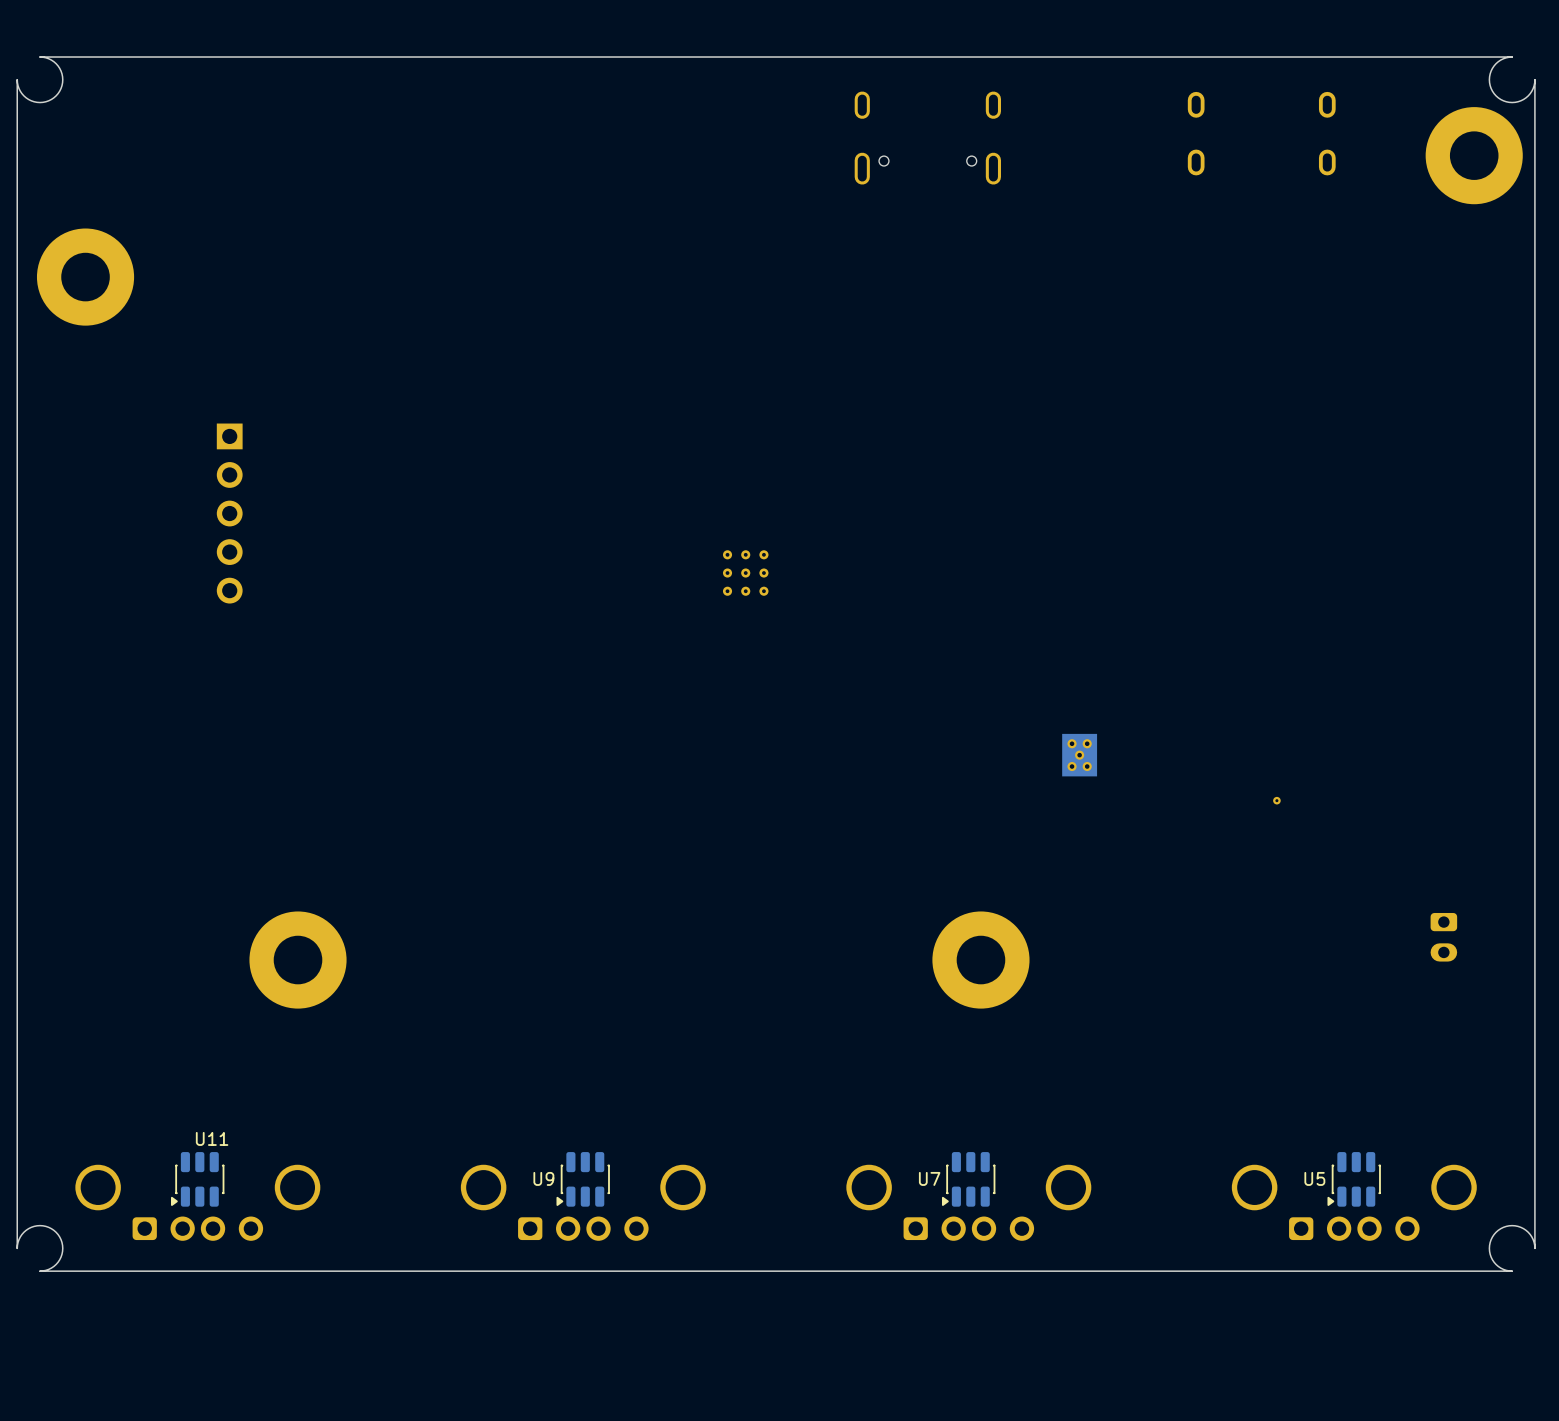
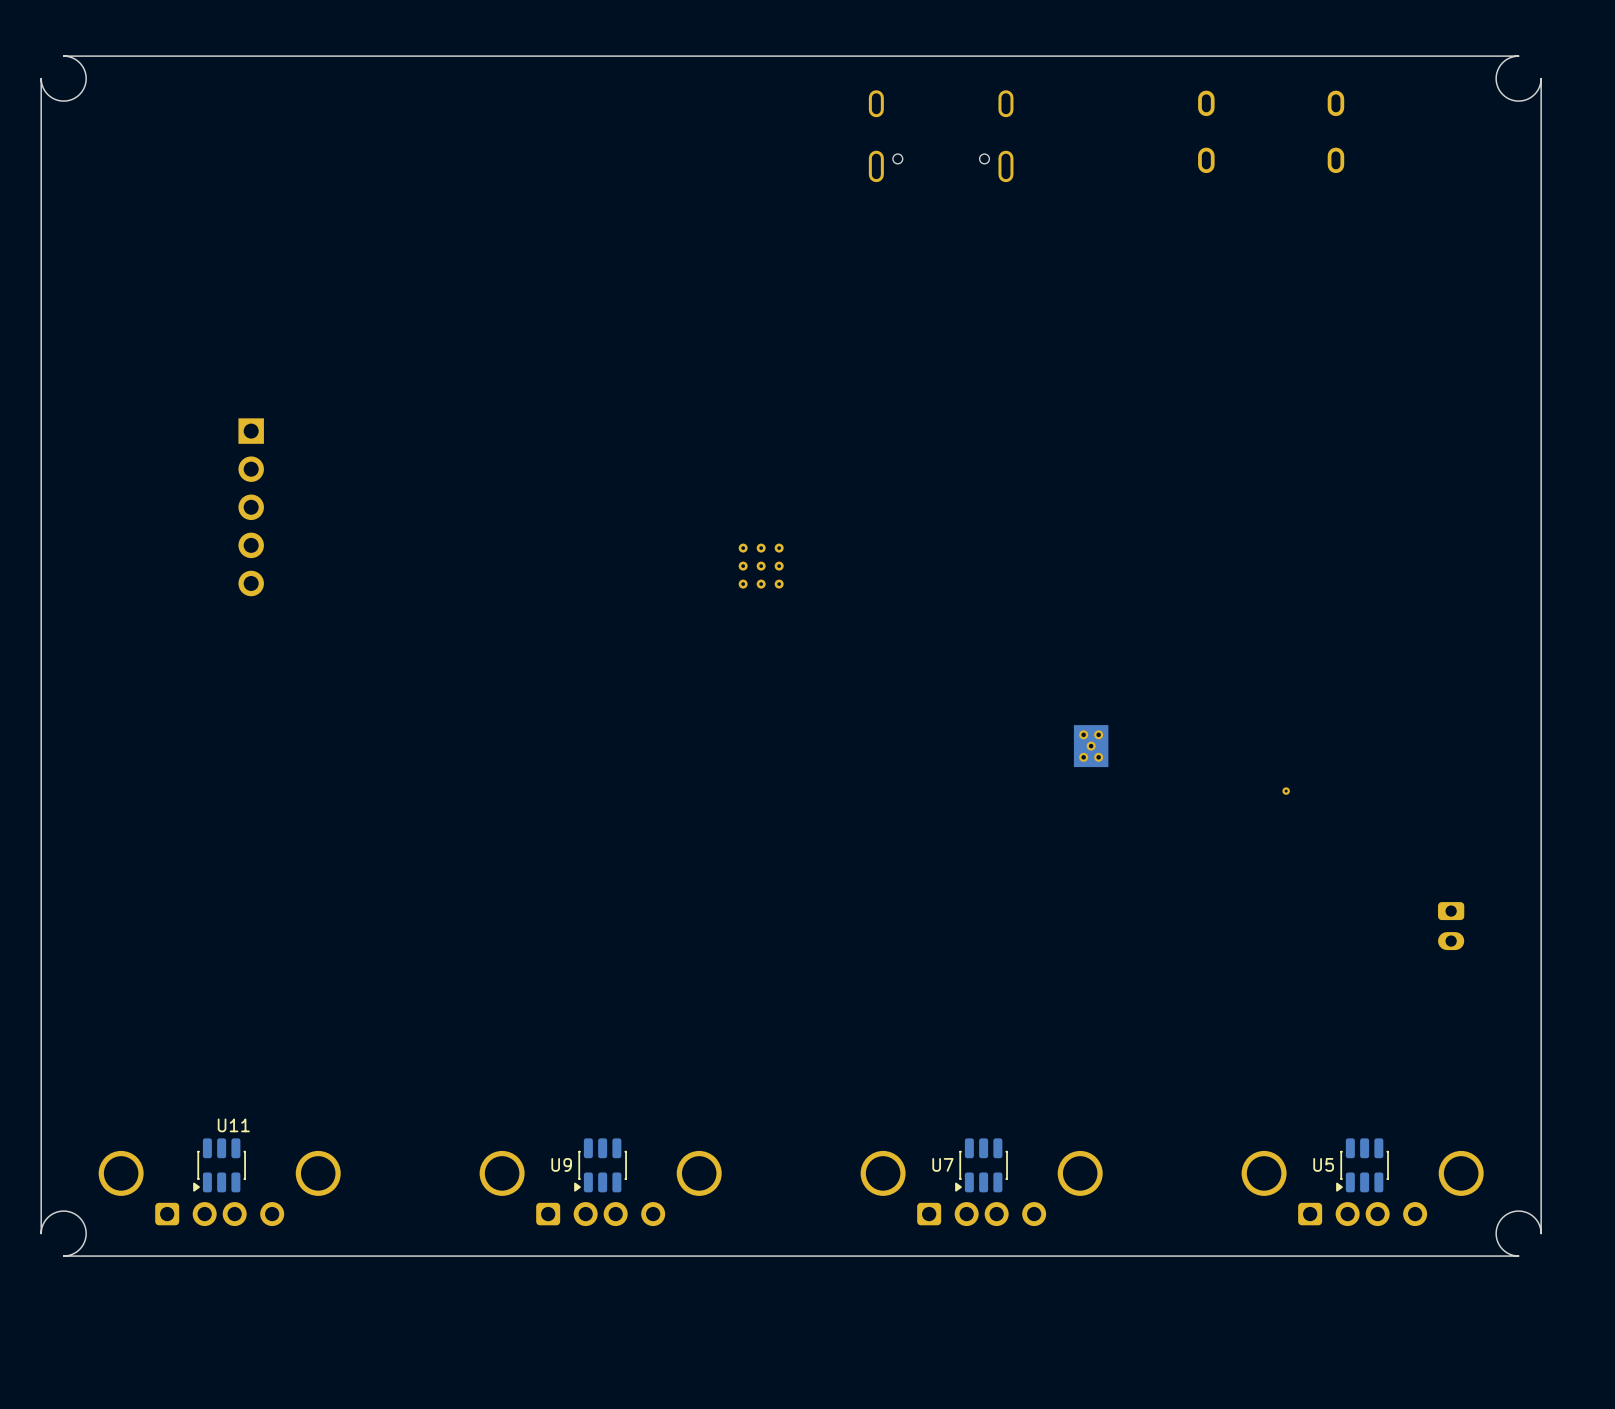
part: (1474, 155) -> none
part: (85, 277) -> none
part: (298, 960) -> none
part: (980, 960) -> none

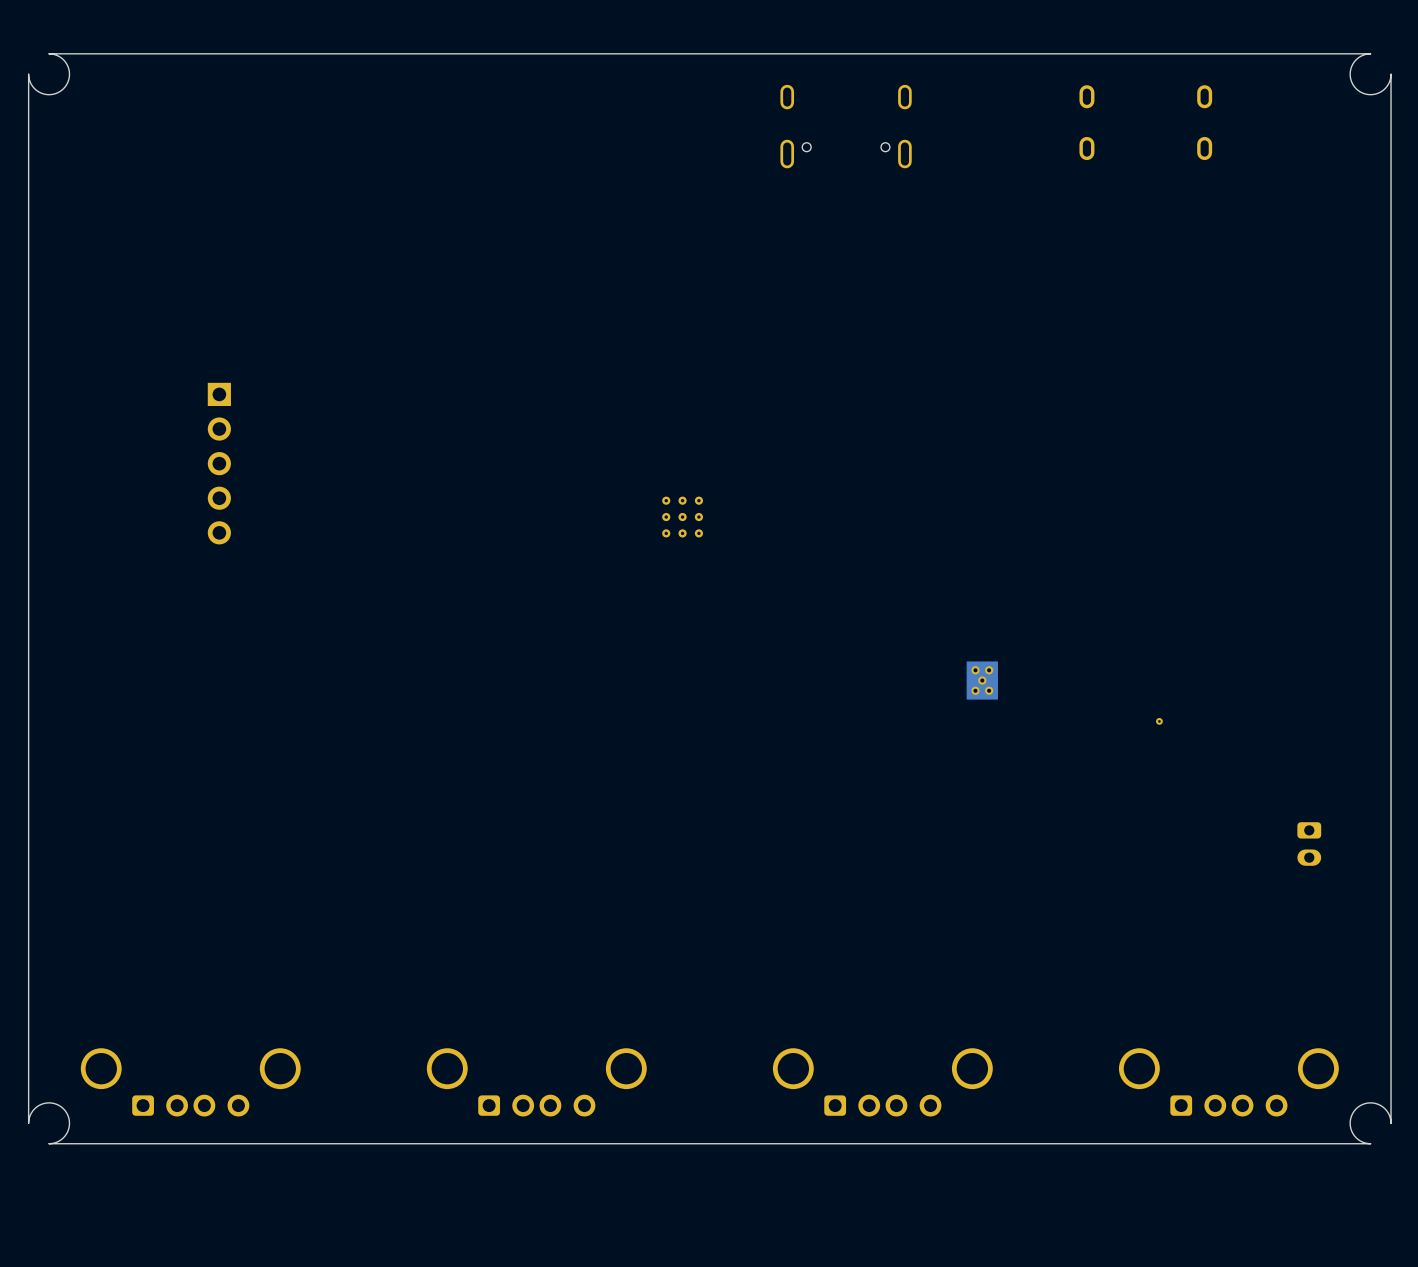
U11: (219, 1165) -> none
U9: (600, 1165) -> none
U7: (981, 1165) -> none
U5: (1362, 1165) -> none

